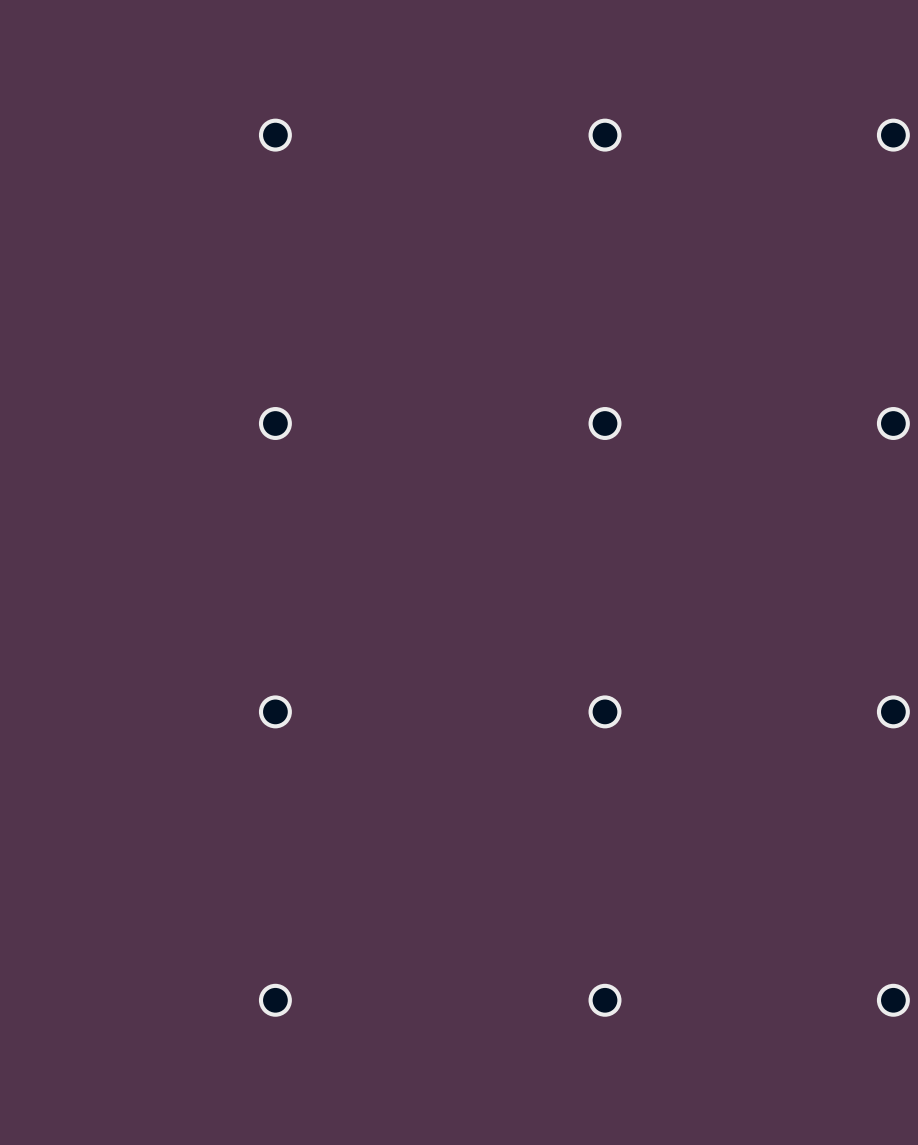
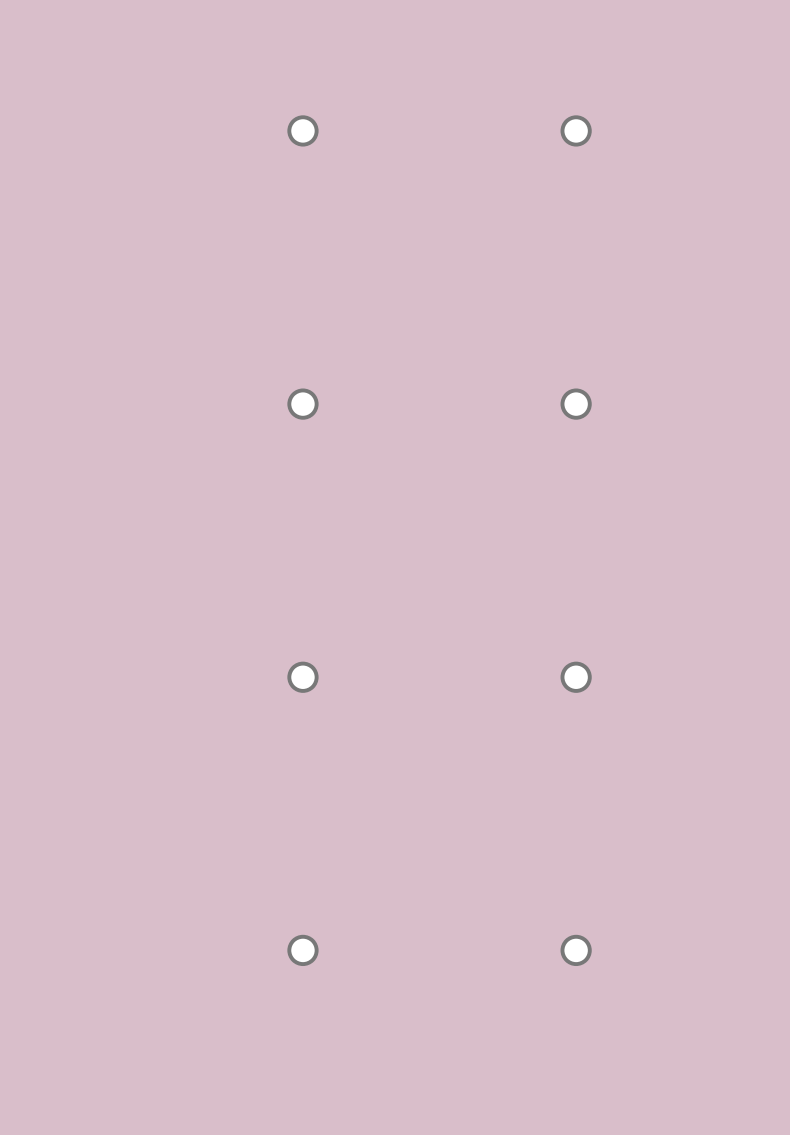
via position: (275, 135) -> (302, 130)
via position: (275, 423) -> (302, 404)
via position: (275, 711) -> (302, 677)
via position: (275, 1000) -> (302, 950)

